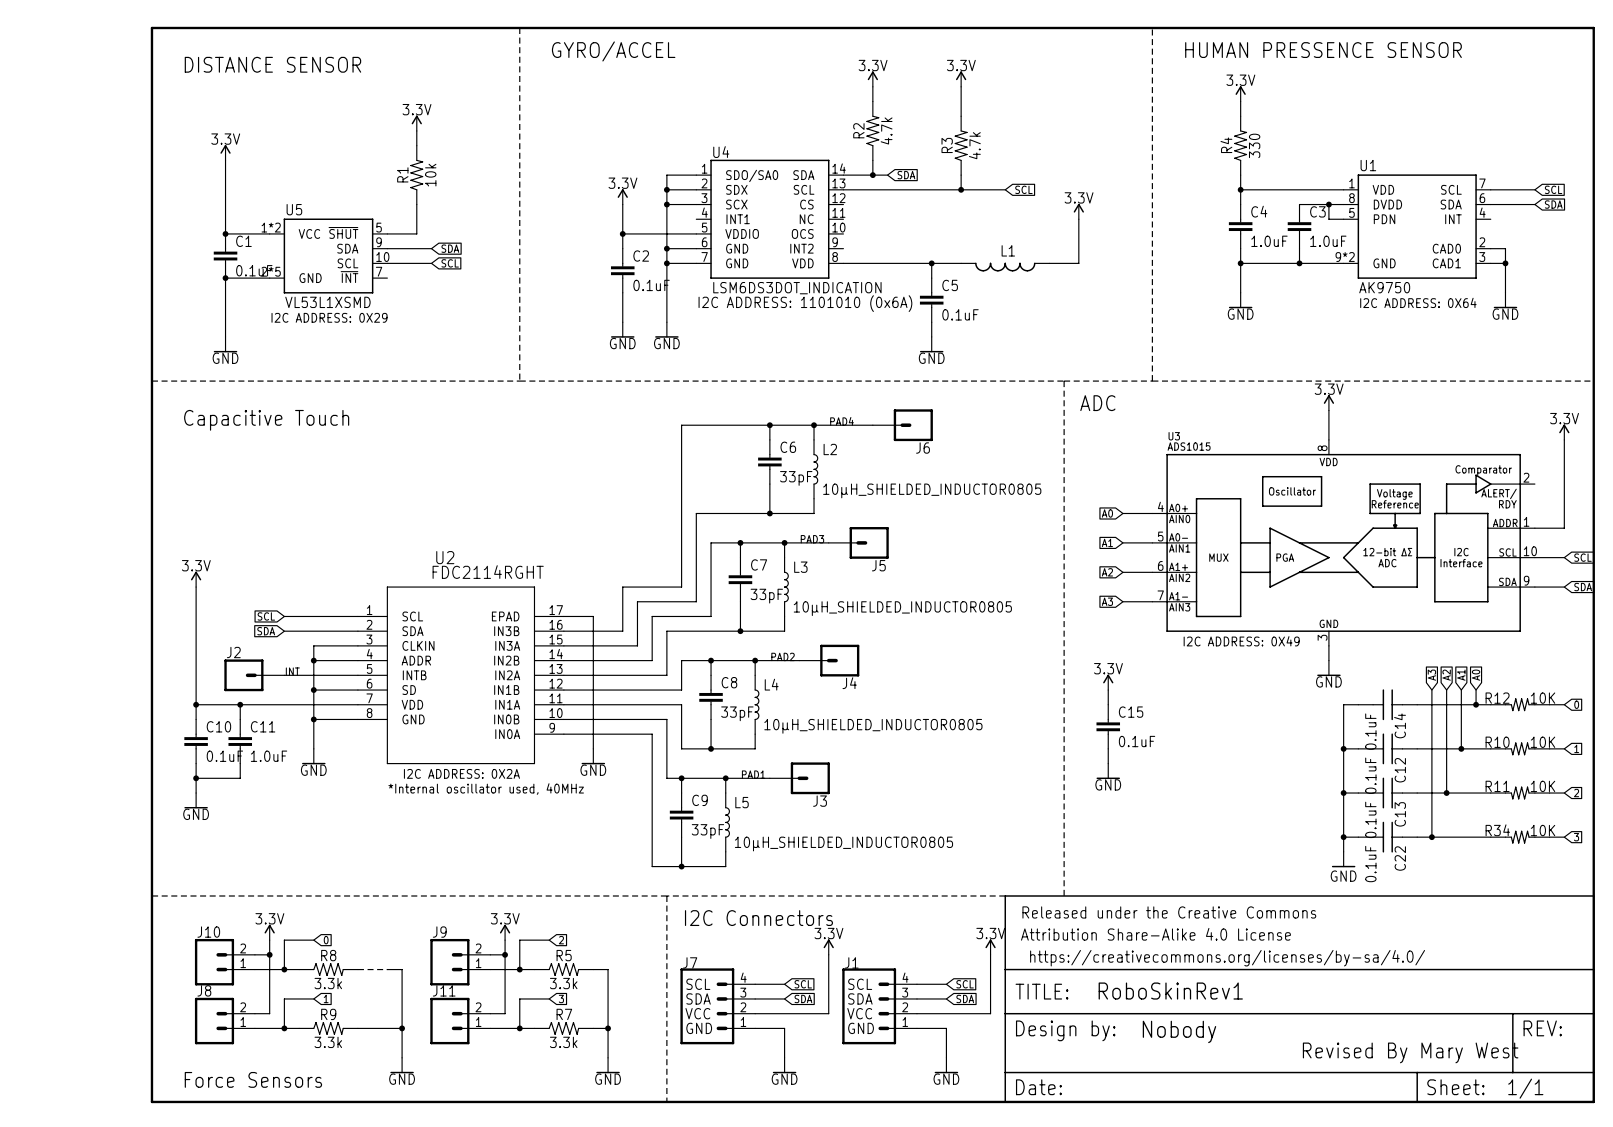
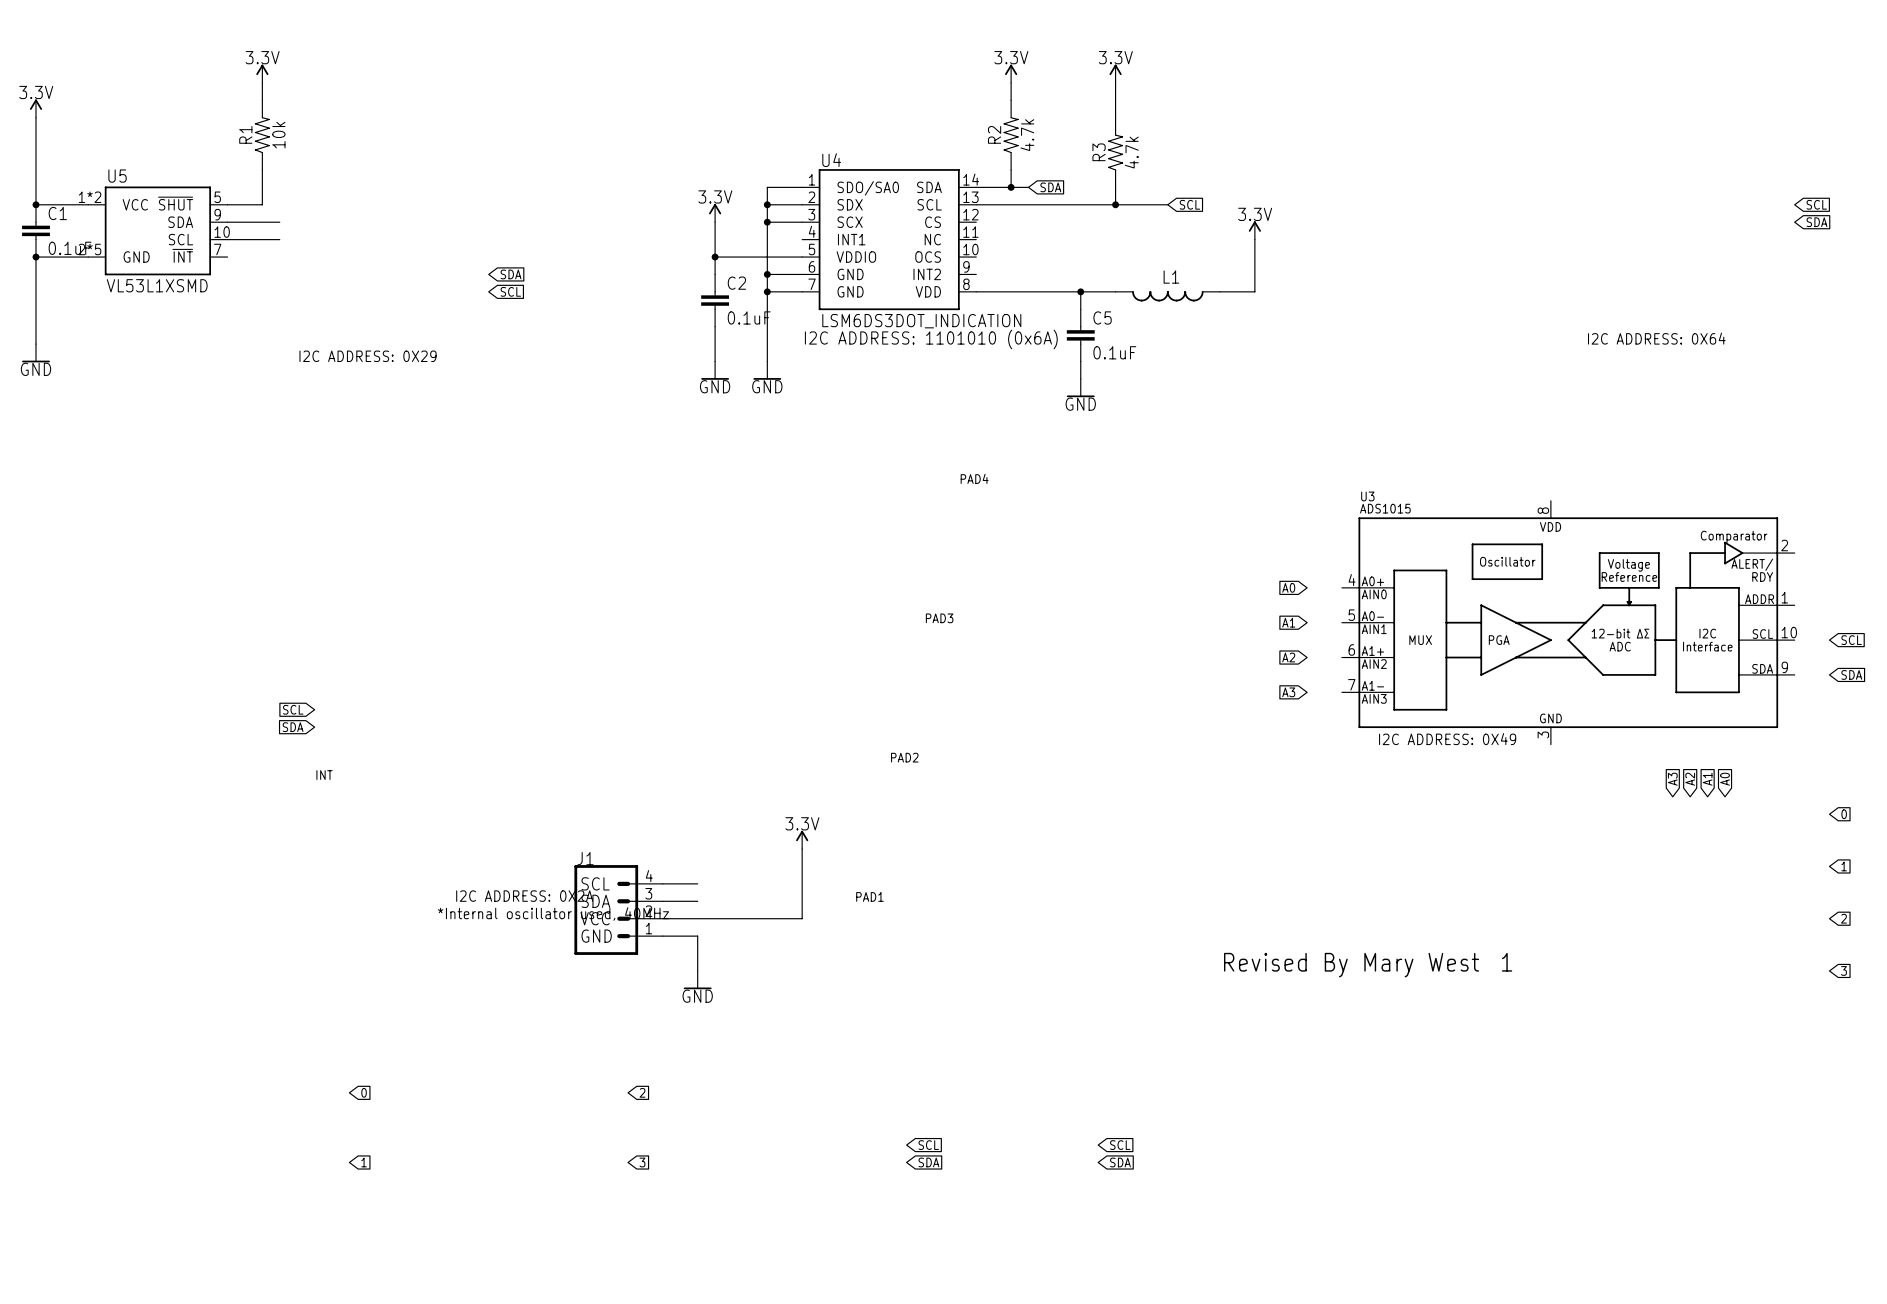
line: (519, 27) (519, 381) -> none
line: (1152, 27) (1152, 381) -> none
text: HUMAN PRESSENCE SENSOR (1323, 50) -> none
text: GYRO/ACCEL (613, 51) -> none
text: DISTANCE SENSOR (272, 64) -> none
wire: none -> (262, 82) (262, 100)
power symbol: 3.3V (1240, 93) -> none
wire: (1240, 101) (1240, 116) -> none
power symbol: none -> 3.3V (36, 108)
wire: none -> (36, 117) (36, 204) (88, 204)
power symbol: 3.3V (416, 123) -> none
wire: (416, 130) (416, 145) -> none
R4: 330 (1240, 145) -> none
power symbol position: 3.3V (225, 152) -> 3.3V (262, 73)
wire: (225, 160) (225, 233) (269, 233) -> none
wire: none -> (262, 169) (262, 204) (227, 204)
R1 position: (416, 175) -> (262, 135)
wire: (1240, 175) (1240, 204) -> none
junction: none -> (36, 204)
wire: (1240, 189) (1343, 189) -> none
junction: (1240, 189) -> none
wire: (1490, 189) (1534, 189) -> none
wire: none -> (227, 222) (279, 222)
wire: (416, 204) (416, 233) (387, 233) -> none
wire: (1299, 204) (1343, 204) -> none
wire: (1328, 204) (1328, 219) (1343, 219) -> none
junction: (1328, 204) -> none
wire: (1490, 204) (1534, 204) -> none
wire: none -> (227, 239) (279, 239)
C4: 1.0uF (1240, 226) -> none
C3: 1.0uF (1299, 226) -> none
U1: AK9750 (1417, 226) -> none
junction: none -> (36, 257)
wire: none -> (88, 257) (36, 257) (36, 344)
junction: (225, 233) -> none
wire: (387, 248) (431, 248) -> none
wire: (1240, 248) (1240, 292) -> none
wire: (1299, 248) (1299, 263) -> none
wire: (1490, 248) (1505, 248) (1505, 292) -> none
C1 position: (225, 256) -> (36, 230)
U5 position: (328, 256) -> (157, 230)
wire: (387, 263) (431, 263) -> none
wire: (1240, 263) (1343, 263) -> none
junction: (1240, 263) -> none
junction: (1299, 263) -> none
wire: (1490, 263) (1505, 263) -> none
junction: (1505, 263) -> none
junction: (225, 278) -> none
wire: (269, 278) (225, 278) (225, 336) -> none
power symbol: GND (1240, 300) -> none
power symbol: GND (1505, 300) -> none
power symbol: none -> GND (36, 353)
power symbol: GND (225, 344) -> none
line: (1064, 381) (1064, 896) -> none
line: (1593, 381) (151, 381) (151, 439) -> none
power symbol: 3.3V (1328, 402) -> none
text: ADC (1097, 403) -> none
wire: (1328, 410) (1328, 439) -> none
text: Capacitive Touch (266, 420) -> none
wire: (769, 425) (769, 439) -> none
junction: (769, 425) -> none
wire: (814, 425) (814, 439) -> none
junction: (814, 425) -> none
wire: (872, 425) (681, 425) (681, 587) (622, 587) (622, 631) (563, 631) -> none
J6: (902, 425) -> none
power symbol: 3.3V (1564, 432) -> none
wire: (1564, 439) (1564, 528) (1534, 528) -> none
C6: 33pF (769, 461) -> none
L2: 10μH_SHIELDED_INDUCTOR0805 (815, 469) -> none
wire: (769, 484) (769, 513) -> none
wire: (814, 498) (814, 513) (696, 513) (696, 601) (637, 601) (637, 645) (563, 645) -> none
junction: (769, 513) -> none
wire: (1122, 513) (1152, 513) -> none
wire: (740, 542) (740, 557) -> none
junction: (740, 542) -> none
wire: (784, 542) (784, 557) -> none
junction: (784, 542) -> none
wire: (828, 542) (711, 542) (711, 616) (652, 616) (652, 660) (563, 660) -> none
J5: (858, 542) -> none
wire: (1122, 542) (1152, 542) -> none
wire: (1534, 557) (1564, 557) -> none
part: (872, 564) -> none
wire: (1122, 572) (1152, 572) -> none
power symbol: 3.3V (196, 579) -> none
C7: 33pF (740, 579) -> none
wire: (196, 587) (196, 719) -> none
L3: 10μH_SHIELDED_INDUCTOR0805 (786, 587) -> none
wire: (1534, 587) (1564, 587) -> none
wire: (740, 601) (740, 631) -> none
wire: (1122, 601) (1152, 601) -> none
wire: (284, 616) (357, 616) -> none
wire: (563, 616) (593, 616) (593, 748) -> none
wire: (784, 616) (784, 631) (666, 631) (666, 675) (563, 675) -> none
wire: (284, 631) (357, 631) -> none
junction: (740, 631) -> none
wire: (357, 645) (313, 645) (313, 748) -> none
wire: (1328, 645) (1328, 660) -> none
wire: (313, 660) (357, 660) -> none
junction: (313, 660) -> none
wire: (711, 660) (711, 675) -> none
junction: (711, 660) -> none
wire: (755, 660) (755, 675) -> none
junction: (755, 660) -> none
wire: (799, 660) (681, 660) (681, 690) (563, 690) -> none
J4: (829, 660) -> none
power symbol: GND (1328, 668) -> none
J2: (254, 675) -> none
wire: (284, 675) (357, 675) -> none
U2: FDC2114RGHT (460, 675) -> none
power symbol: 3.3V (1108, 682) -> none
wire: (313, 690) (357, 690) -> none
junction: (313, 690) -> none
wire: (1108, 690) (1108, 704) -> none
wire: (1431, 690) (1431, 837) -> none
wire: (1446, 690) (1446, 793) -> none
wire: (1461, 690) (1461, 748) -> none
wire: (1476, 690) (1476, 704) -> none
C8: 33pF (711, 697) -> none
wire: (196, 704) (357, 704) -> none
junction: (196, 704) -> none
wire: (240, 704) (240, 719) -> none
junction: (240, 704) -> none
wire: (563, 704) (681, 704) (681, 748) (755, 748) (755, 734) -> none
L4: 10μH_SHIELDED_INDUCTOR0805 (757, 704) -> none
wire: (1358, 704) (1343, 704) (1343, 851) -> none
C14: 0.1uF (1387, 704) -> none
wire: (1417, 704) (1490, 704) -> none
junction: (1476, 704) -> none
R12: 10K (1520, 704) -> none
wire: (1549, 704) (1564, 704) -> none
wire: (313, 719) (357, 719) -> none
junction: (313, 719) -> none
wire: (563, 719) (666, 719) (666, 778) (769, 778) -> none
wire: (711, 719) (711, 748) -> none
power symbol: none -> 3.3V (802, 839)
C15: 0.1uF (1108, 726) -> none
wire: (563, 734) (652, 734) (652, 866) (725, 866) (725, 851) -> none
wire: none -> (802, 849) (802, 918) (662, 918)
C10: 0.1uF (196, 741) -> none
C11: 1.0uF (240, 741) -> none
junction: (711, 748) -> none
wire: (1108, 748) (1108, 763) -> none
wire: (1343, 748) (1358, 748) -> none
junction: (1343, 748) -> none
C12: 0.1uF (1387, 748) -> none
wire: (1417, 748) (1490, 748) -> none
junction: (1461, 748) -> none
R10: 10K (1520, 748) -> none
wire: (1549, 748) (1564, 748) -> none
power symbol: GND (313, 756) -> none
power symbol position: GND (593, 756) -> GND (697, 980)
wire: (196, 763) (196, 793) -> none
wire: (240, 763) (240, 778) (196, 778) -> none
power symbol: GND (1108, 771) -> none
junction: (196, 778) -> none
wire: none -> (662, 901) (697, 901)
wire: (681, 778) (681, 793) -> none
junction: (681, 778) -> none
wire: (725, 778) (725, 793) -> none
junction: (725, 778) -> none
J3: (799, 778) -> none
wire: (1343, 793) (1358, 793) -> none
junction: (1343, 793) -> none
C13: 0.1uF (1387, 793) -> none
wire: (1417, 793) (1490, 793) -> none
junction: (1446, 793) -> none
R11: 10K (1520, 793) -> none
wire: (1549, 793) (1564, 793) -> none
power symbol: GND (196, 800) -> none
wire: none -> (662, 936) (697, 936) (697, 970)
C9: 33pF (681, 815) -> none
L5: 10μH_SHIELDED_INDUCTOR0805 (727, 822) -> none
text: none -> 1 (1507, 962)
text: none -> Revised By Mary West (1351, 965)
wire: (681, 837) (681, 866) -> none
wire: (1343, 837) (1358, 837) -> none
junction: (1343, 837) -> none
C22: 0.1uF (1387, 837) -> none
wire: (1417, 837) (1490, 837) -> none
junction: (1431, 837) -> none
R34: 10K (1520, 837) -> none
wire: (1549, 837) (1564, 837) -> none
power symbol: GND (1343, 859) -> none
junction: (681, 866) -> none
line: (151, 896) (1005, 896) -> none
line: (666, 896) (666, 1101) -> none
text: I2C Connectors (758, 918) -> none
power symbol: 3.3V (269, 932) -> none
power symbol: 3.3V (505, 932) -> none
wire: (269, 940) (269, 1013) (254, 1013) -> none
wire: (313, 940) (284, 940) (284, 969) -> none
wire: (505, 940) (505, 1013) (490, 1013) -> none
wire: (549, 940) (519, 940) (519, 969) -> none
power symbol: 3.3V (828, 947) -> none
power symbol: 3.3V (990, 947) -> none
wire: (254, 954) (269, 954) -> none
junction: (269, 954) -> none
wire: (490, 954) (505, 954) -> none
junction: (505, 954) -> none
wire: (828, 954) (828, 1013) (755, 1013) -> none
wire: (990, 954) (990, 1013) (916, 1013) -> none
J10: (224, 962) -> none
J9: (460, 962) -> none
wire: (254, 969) (299, 969) -> none
junction: (284, 969) -> none
R8: 3.3k (328, 969) -> none
wire: (357, 969) (402, 969) (402, 1057) -> none
wire: (490, 969) (534, 969) -> none
junction: (519, 969) -> none
R5: 3.3k (563, 969) -> none
wire: (593, 969) (608, 969) (608, 1057) -> none
wire: (755, 984) (784, 984) -> none
wire: (916, 984) (946, 984) -> none
wire: (313, 998) (284, 998) (284, 1028) -> none
wire: (549, 998) (519, 998) (519, 1028) -> none
wire: (755, 998) (784, 998) -> none
wire: (916, 998) (946, 998) -> none
part: (1299, 998) -> none
J7: (717, 1006) -> none
J1 position: (879, 1006) -> (618, 910)
J8: (224, 1021) -> none
J11: (460, 1021) -> none
wire: (254, 1028) (299, 1028) -> none
junction: (284, 1028) -> none
R9: 3.3k (328, 1028) -> none
wire: (357, 1028) (402, 1028) -> none
junction: (402, 1028) -> none
wire: (490, 1028) (534, 1028) -> none
junction: (519, 1028) -> none
R7: 3.3k (563, 1028) -> none
wire: (593, 1028) (608, 1028) -> none
junction: (608, 1028) -> none
wire: (755, 1028) (784, 1028) (784, 1057) -> none
wire: (916, 1028) (946, 1028) (946, 1057) -> none
text: Revised By Mary West (1410, 1052) -> none
power symbol: GND (402, 1065) -> none
power symbol: GND (608, 1065) -> none
power symbol: GND (784, 1065) -> none
power symbol: GND (946, 1065) -> none
text: Force Sensors (253, 1079) -> none

